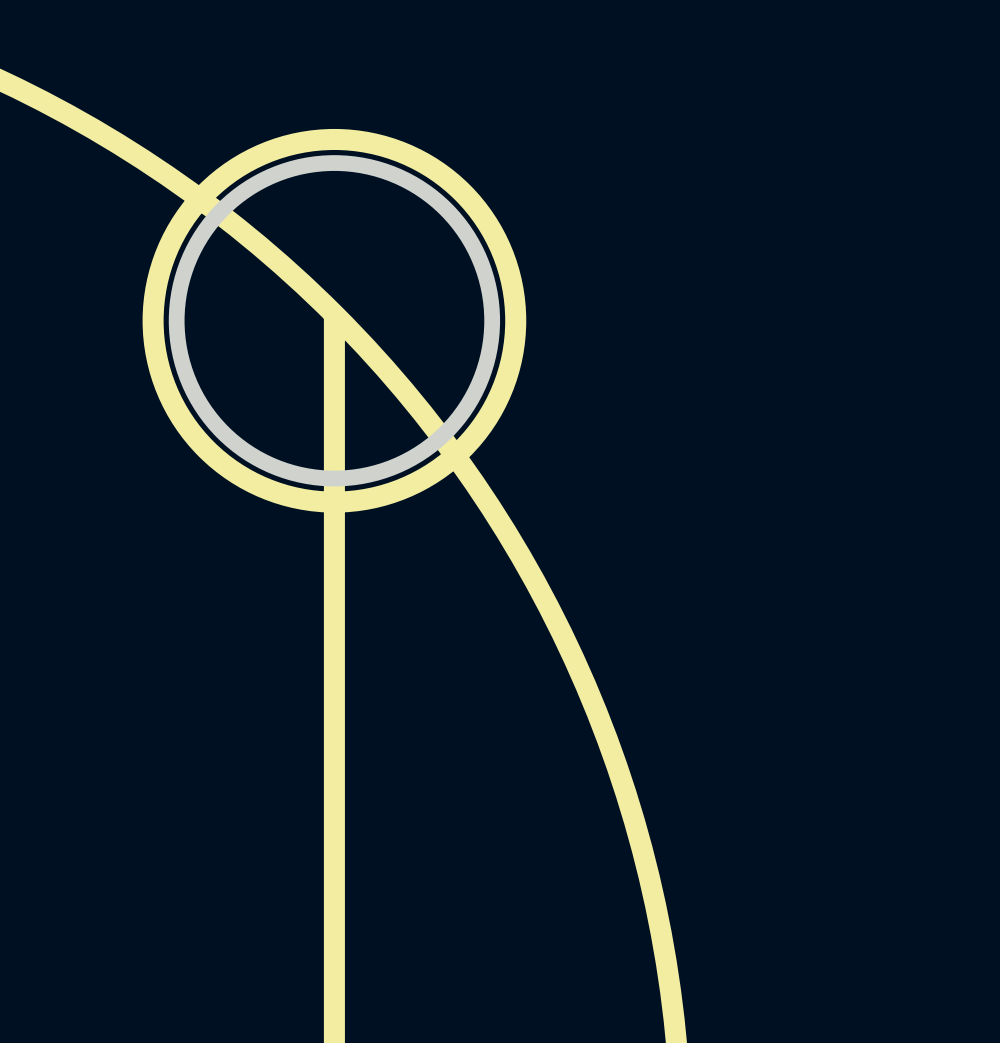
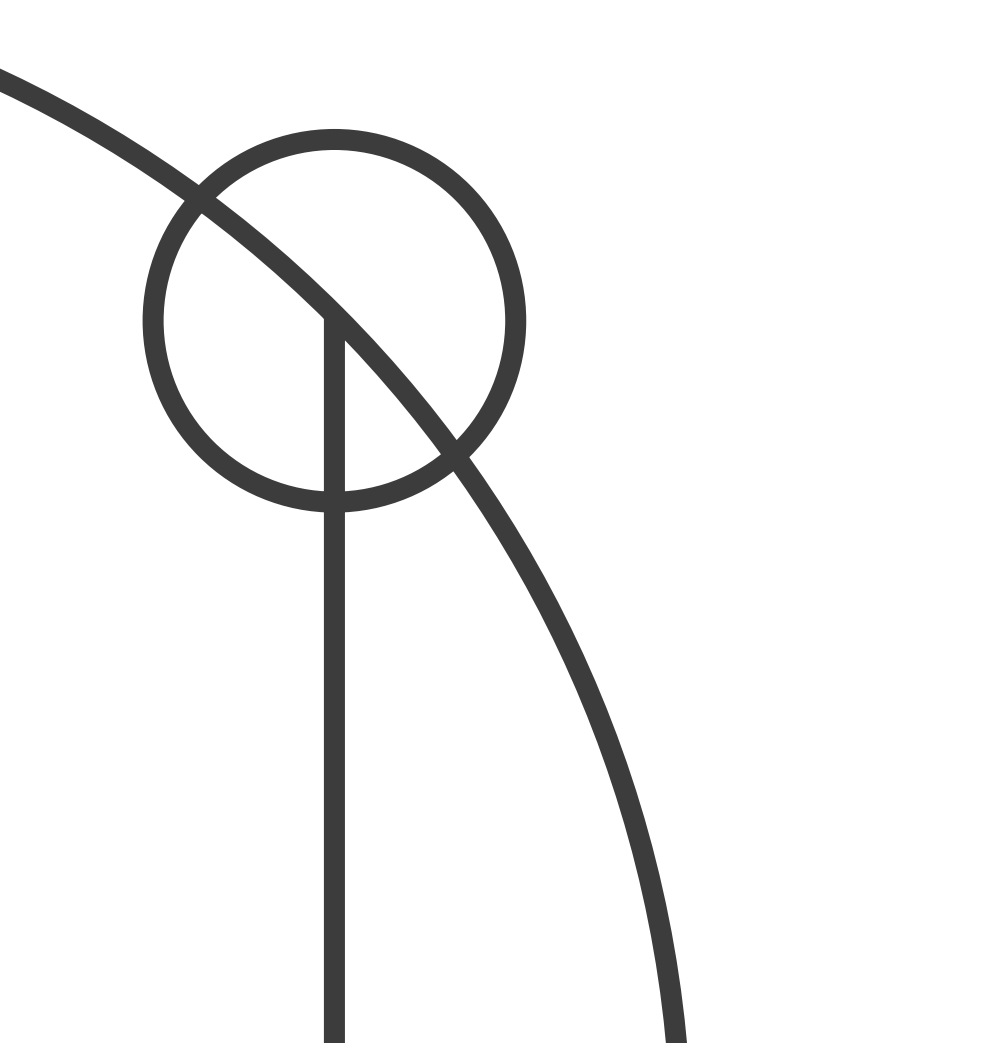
round board edge: [168, 155, 501, 487] -> none

